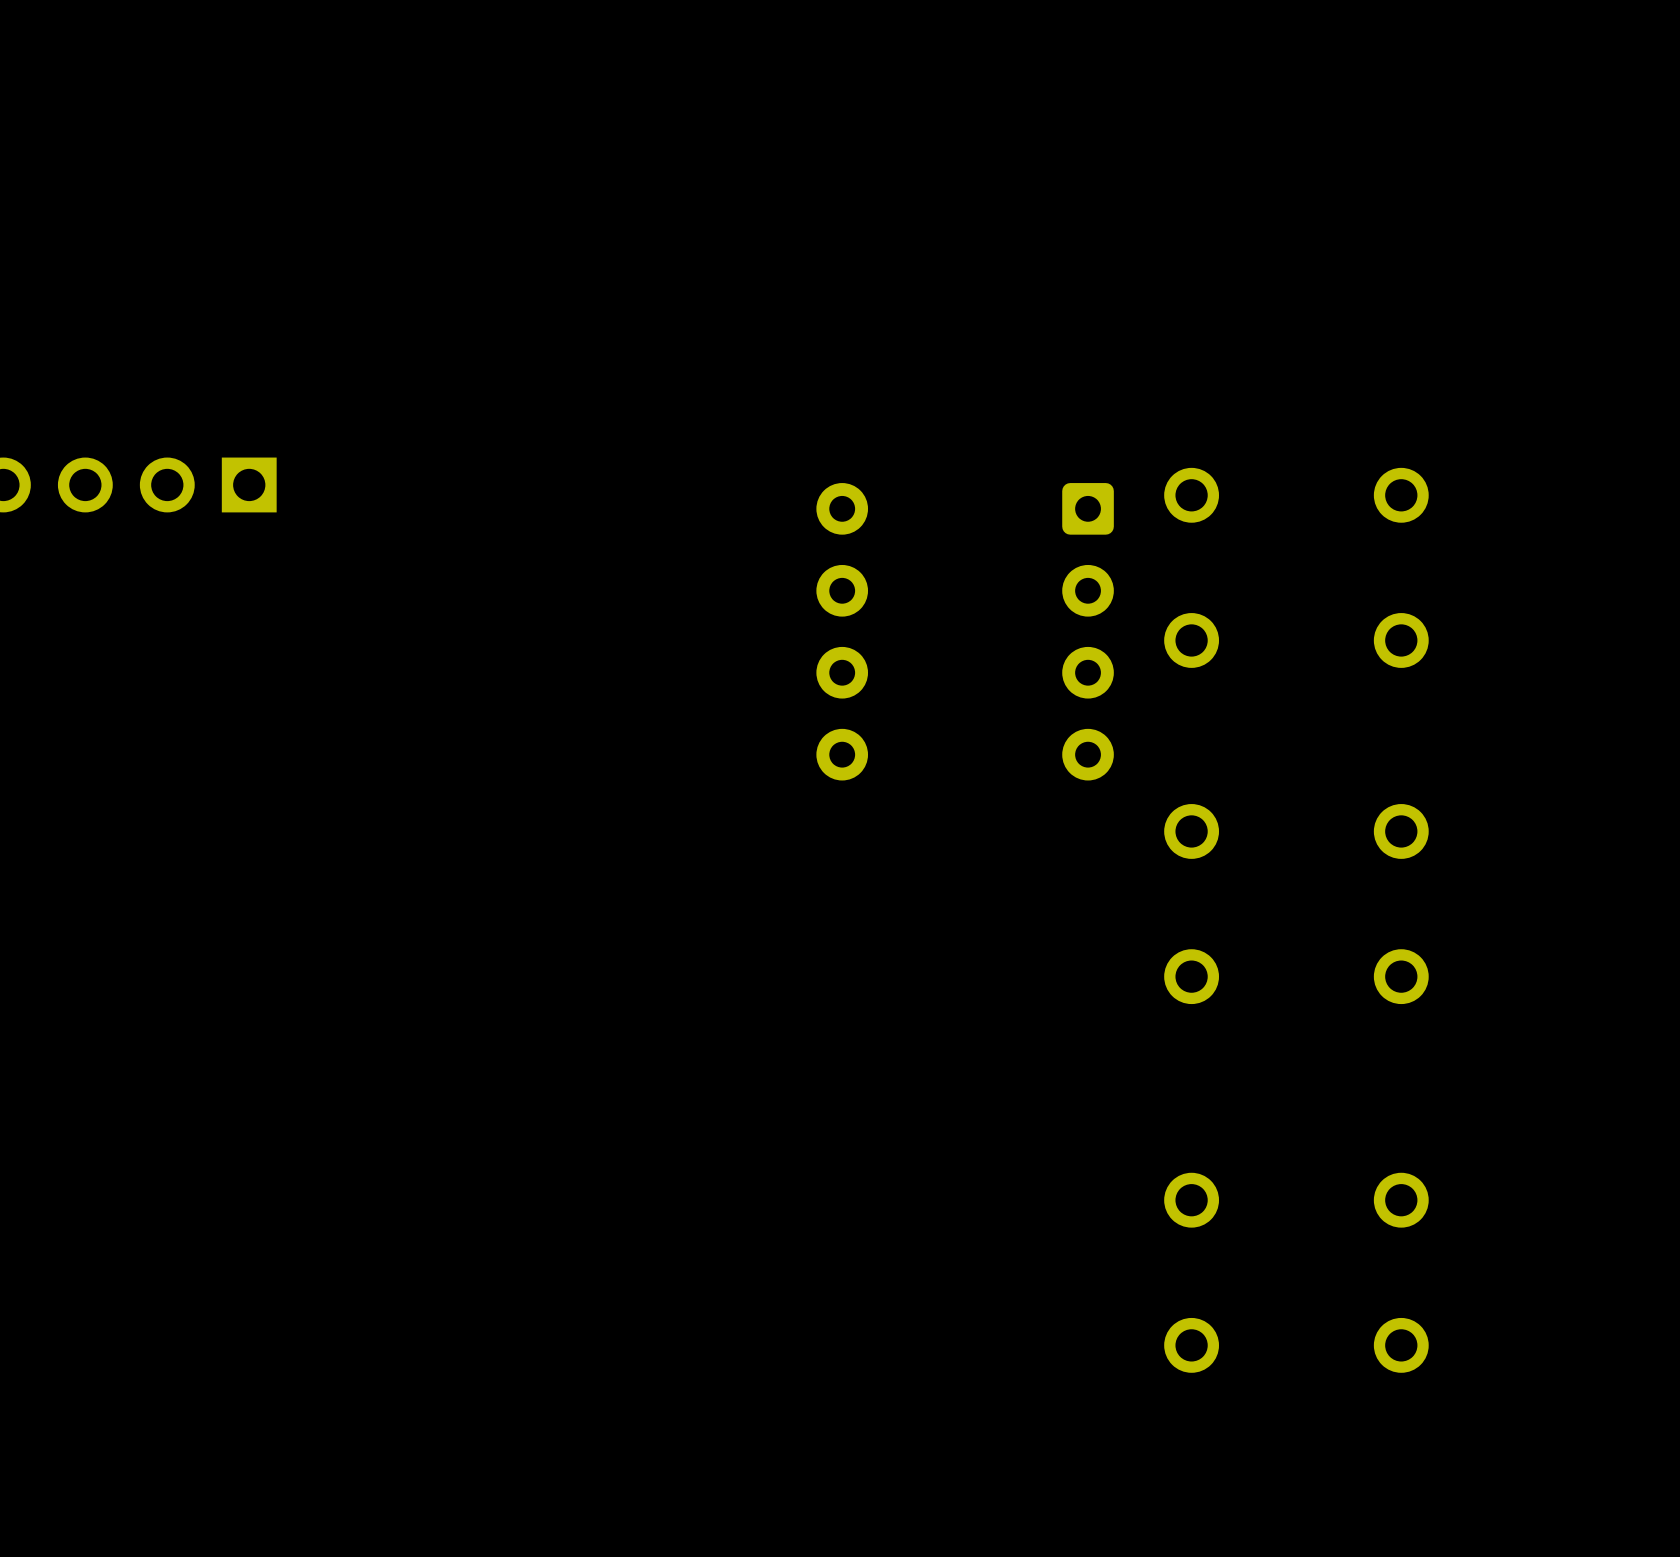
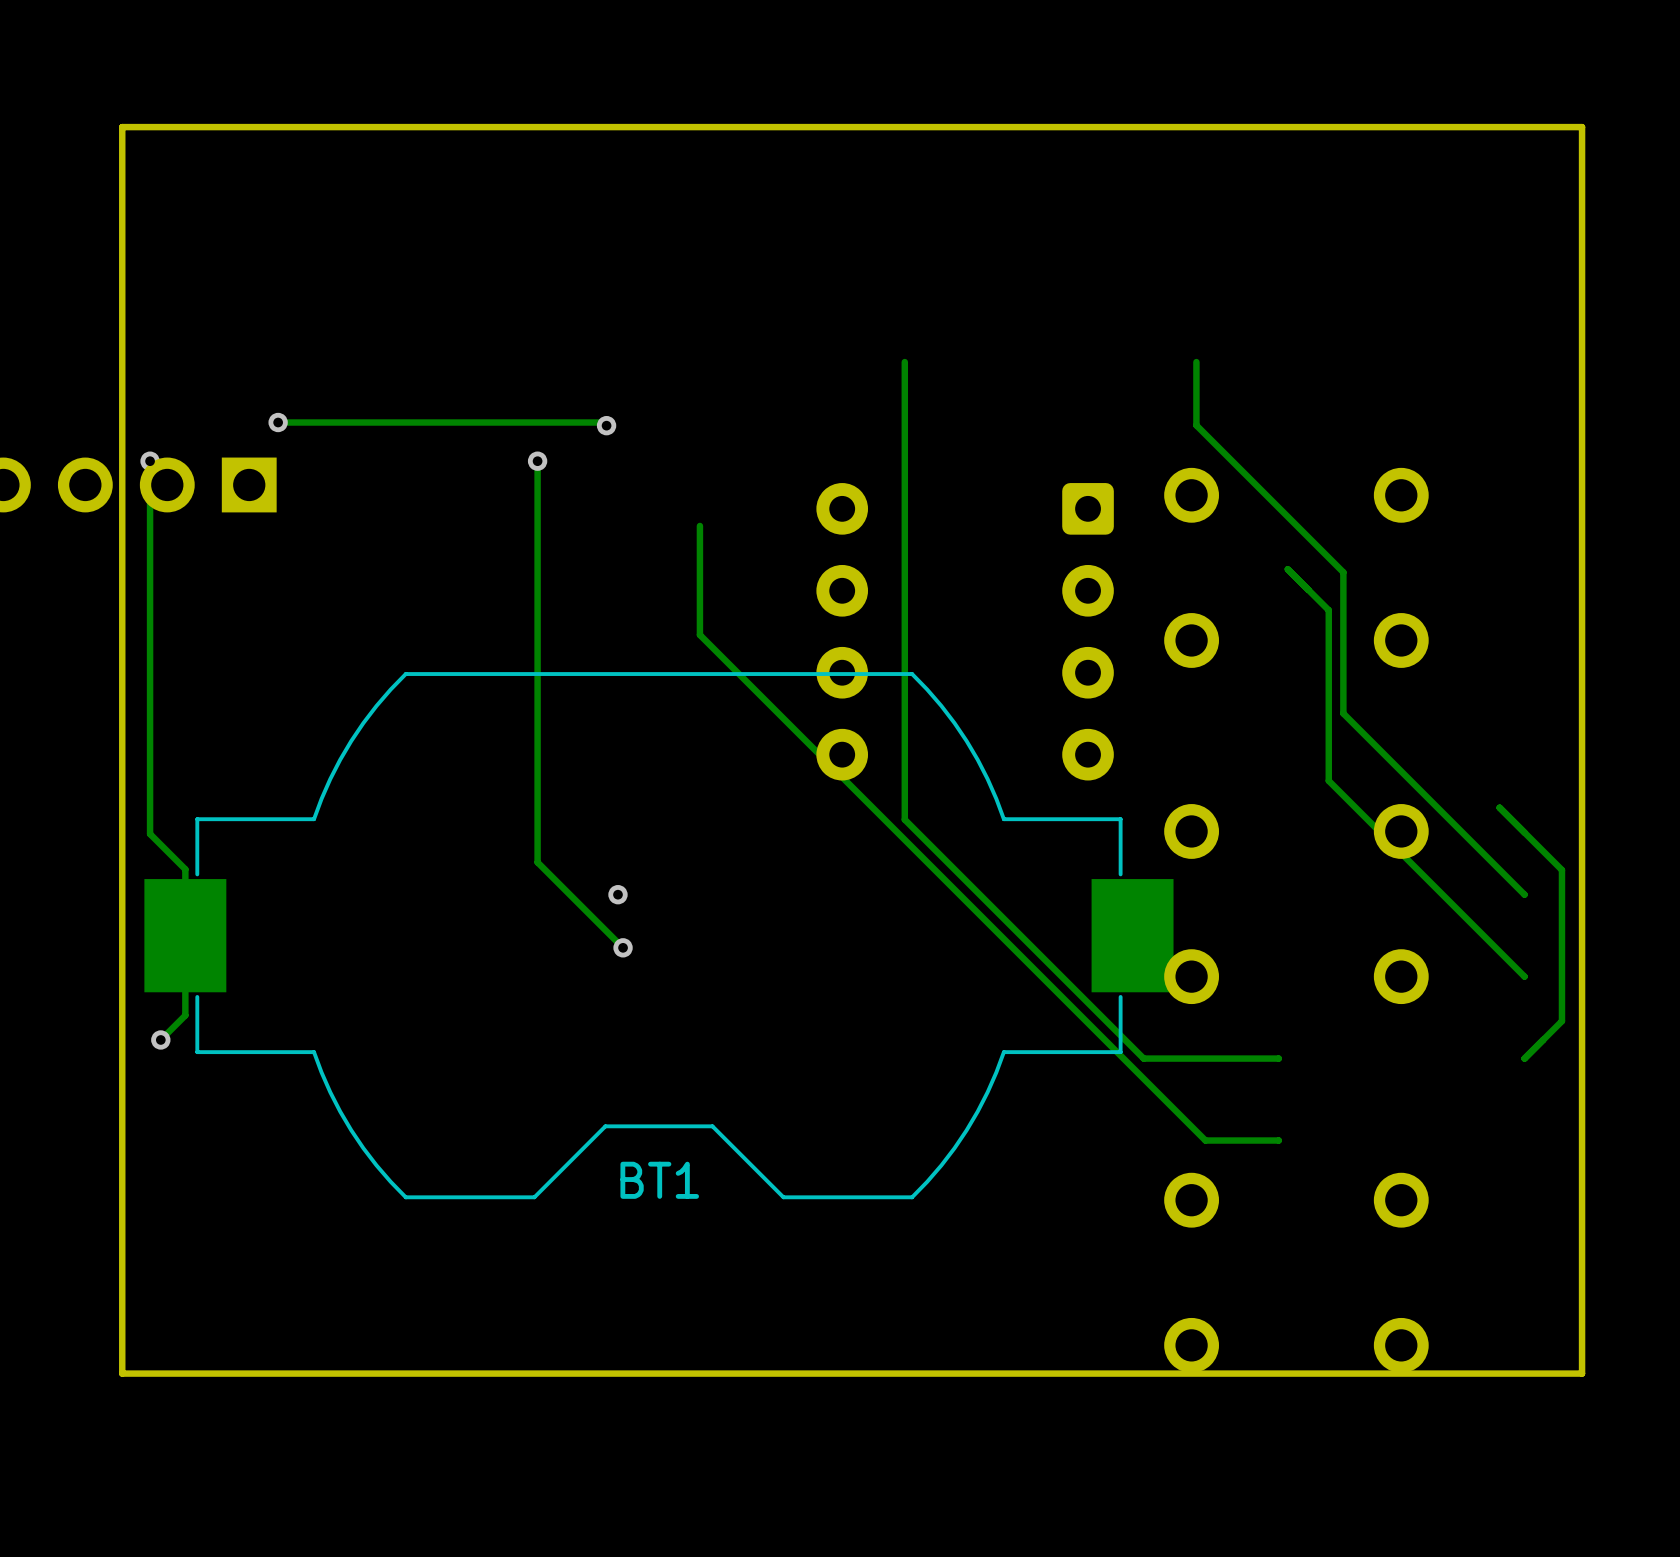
board edge: none -> (1582, 127) (122, 127) (122, 1373) (1582, 1373) (1582, 127)
track: none -> (904, 362) (904, 819) (1143, 1058) (1278, 1058)
track: none -> (1196, 362) (1196, 425) (1343, 572) (1343, 713) (1524, 894)
track: none -> (278, 422) (603, 422) (606, 425)
via: none -> (278, 422)
via: none -> (606, 425)
track: none -> (150, 461) (150, 834) (185, 869) (185, 1015) (160, 1039)
via: none -> (150, 461)
track: none -> (537, 461) (537, 862) (623, 947)
via: none -> (537, 461)
track: none -> (699, 525) (699, 634) (1205, 1140) (1278, 1140)
track: none -> (1287, 569) (1328, 610) (1328, 780) (1524, 976)
track: none -> (1524, 832) (1499, 807) (1561, 870) (1561, 1021) (1524, 1058) (1543, 1039)
via: none -> (617, 894)
BT1: none -> (658, 935)
via: none -> (623, 947)
via: none -> (160, 1039)

